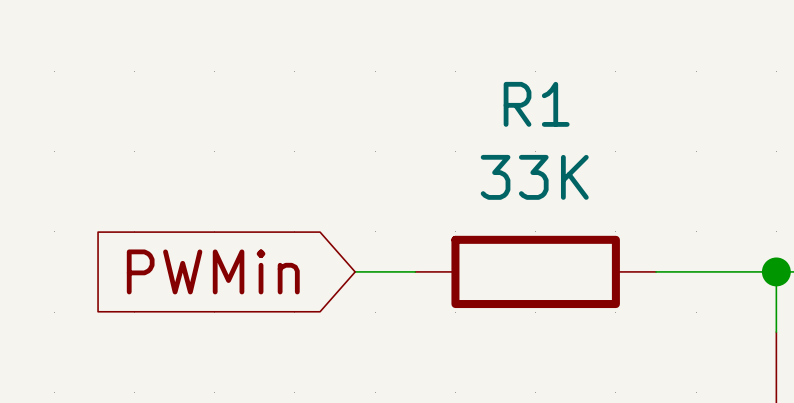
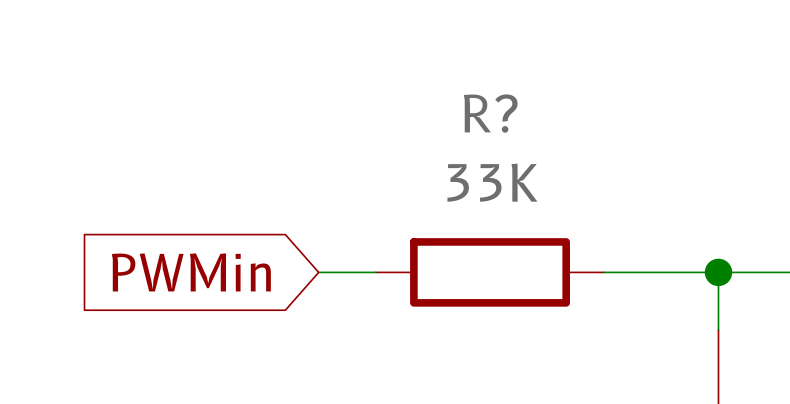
R1 name: R1 (536, 104) -> R? (490, 113)

